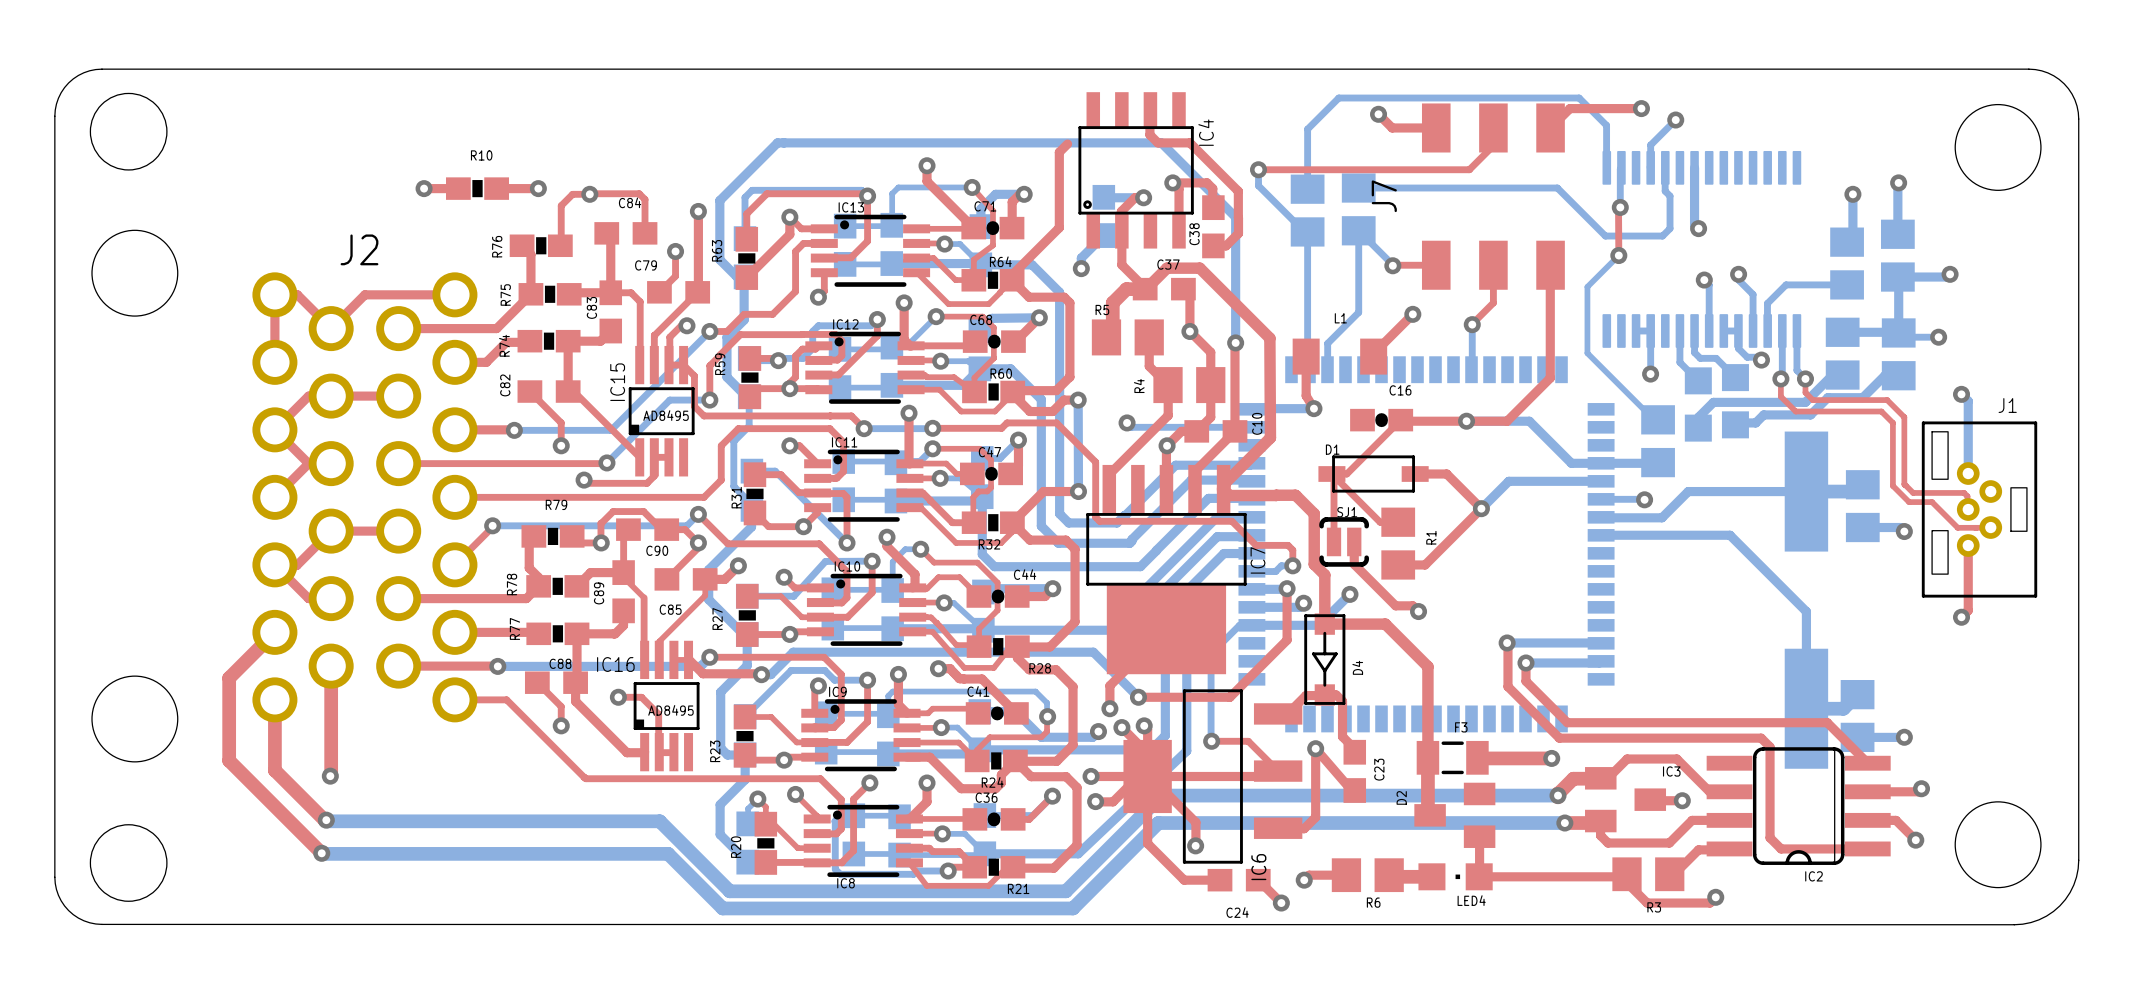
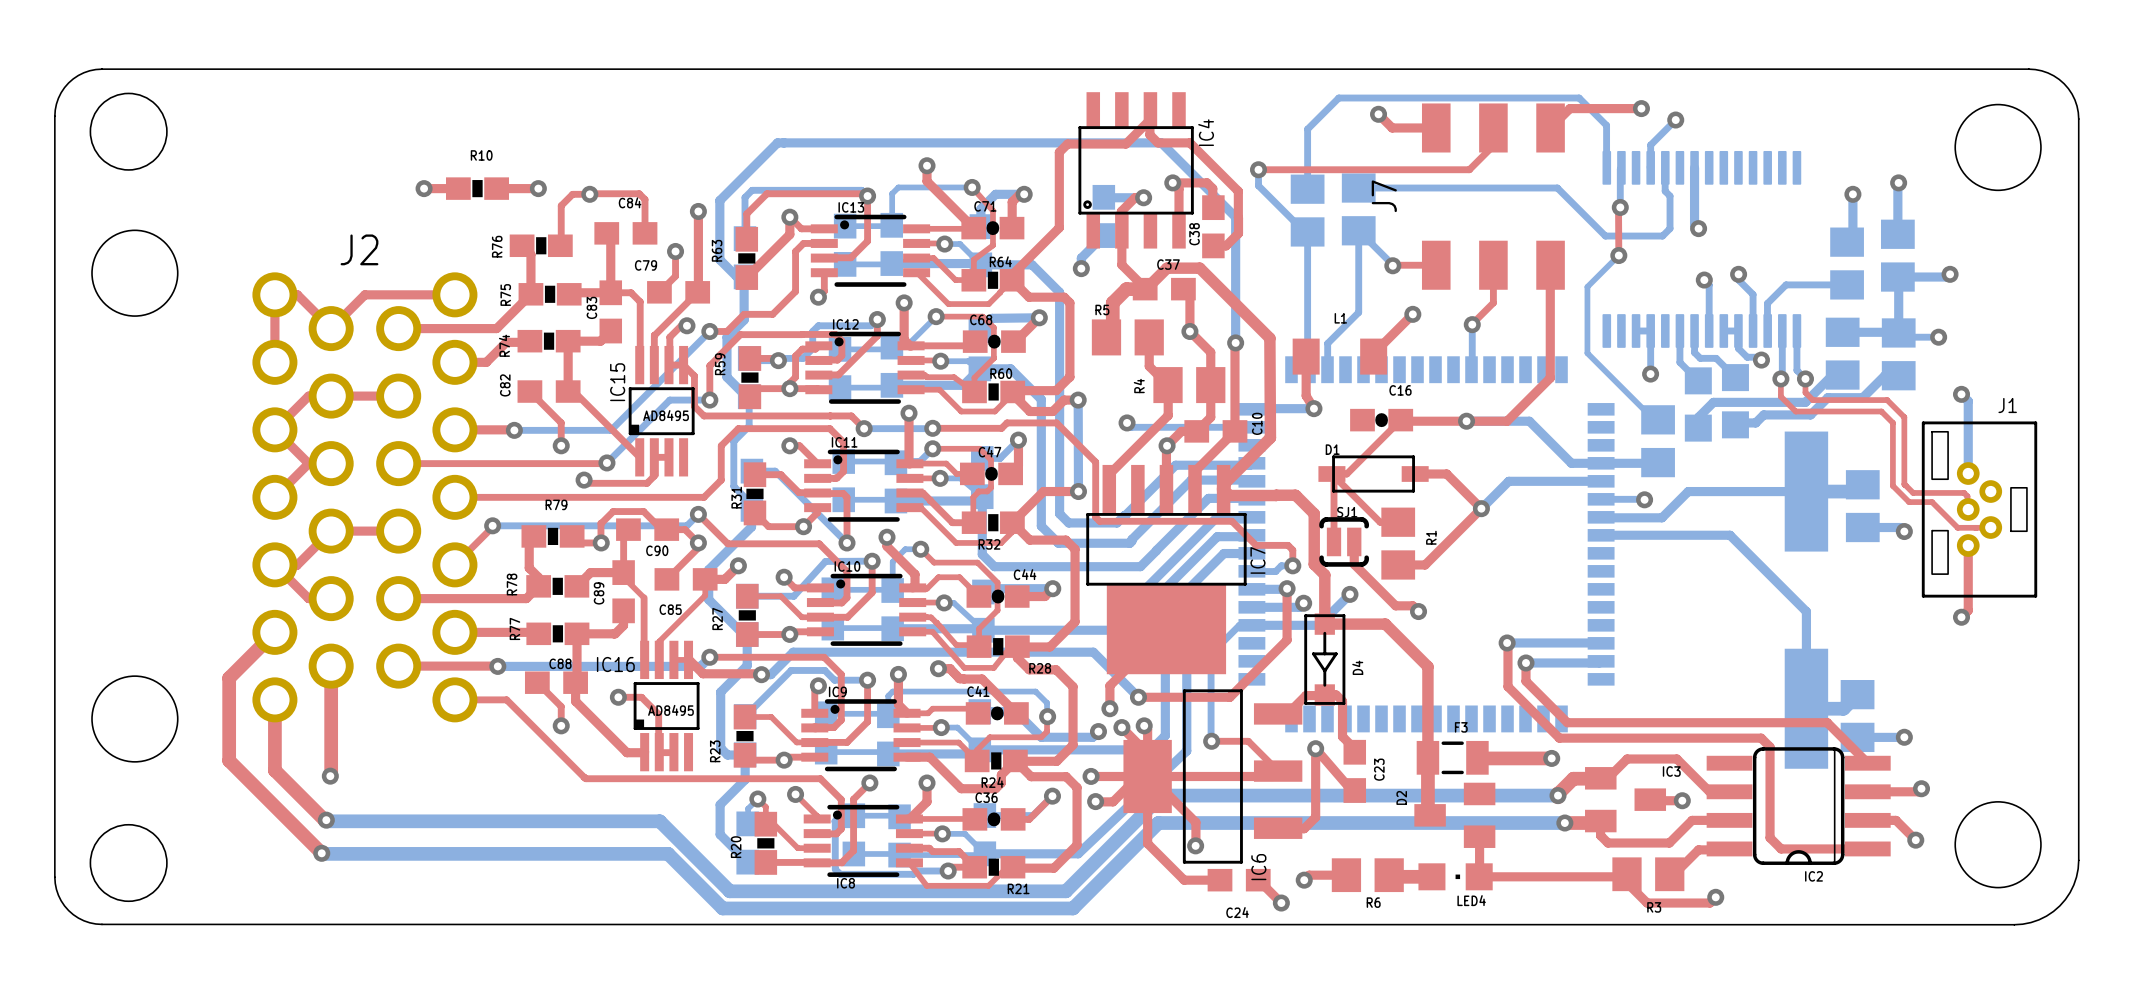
top track: none -> (1149, 120) (1125, 144) (1067, 144)

